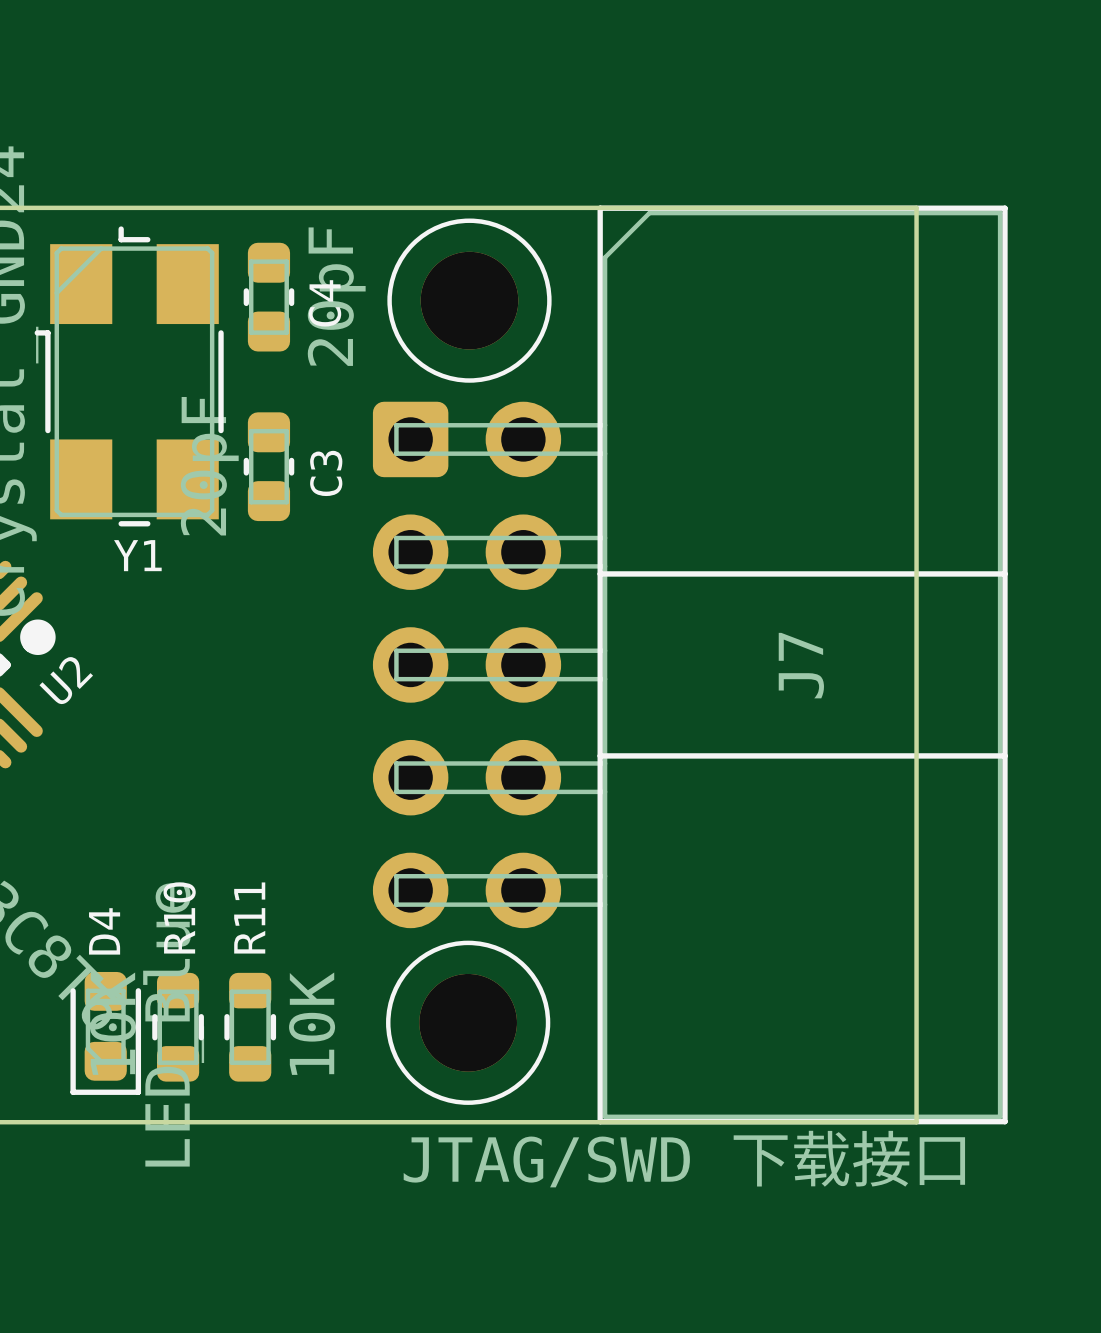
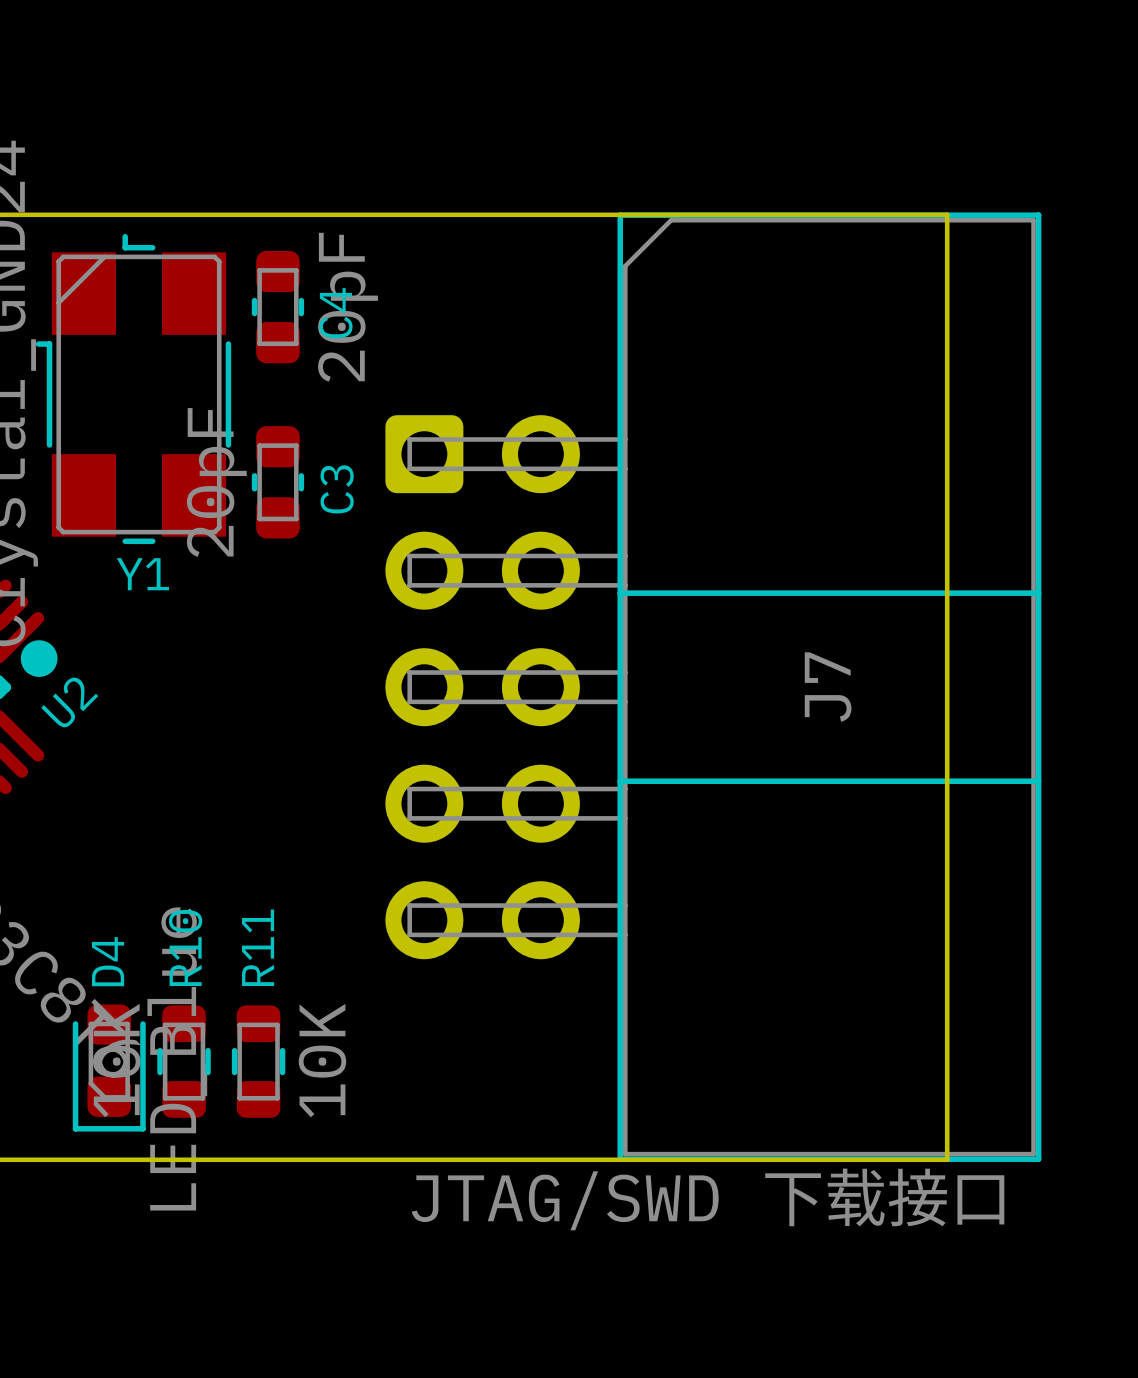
part: (469, 300) -> none
part: (468, 1022) -> none

